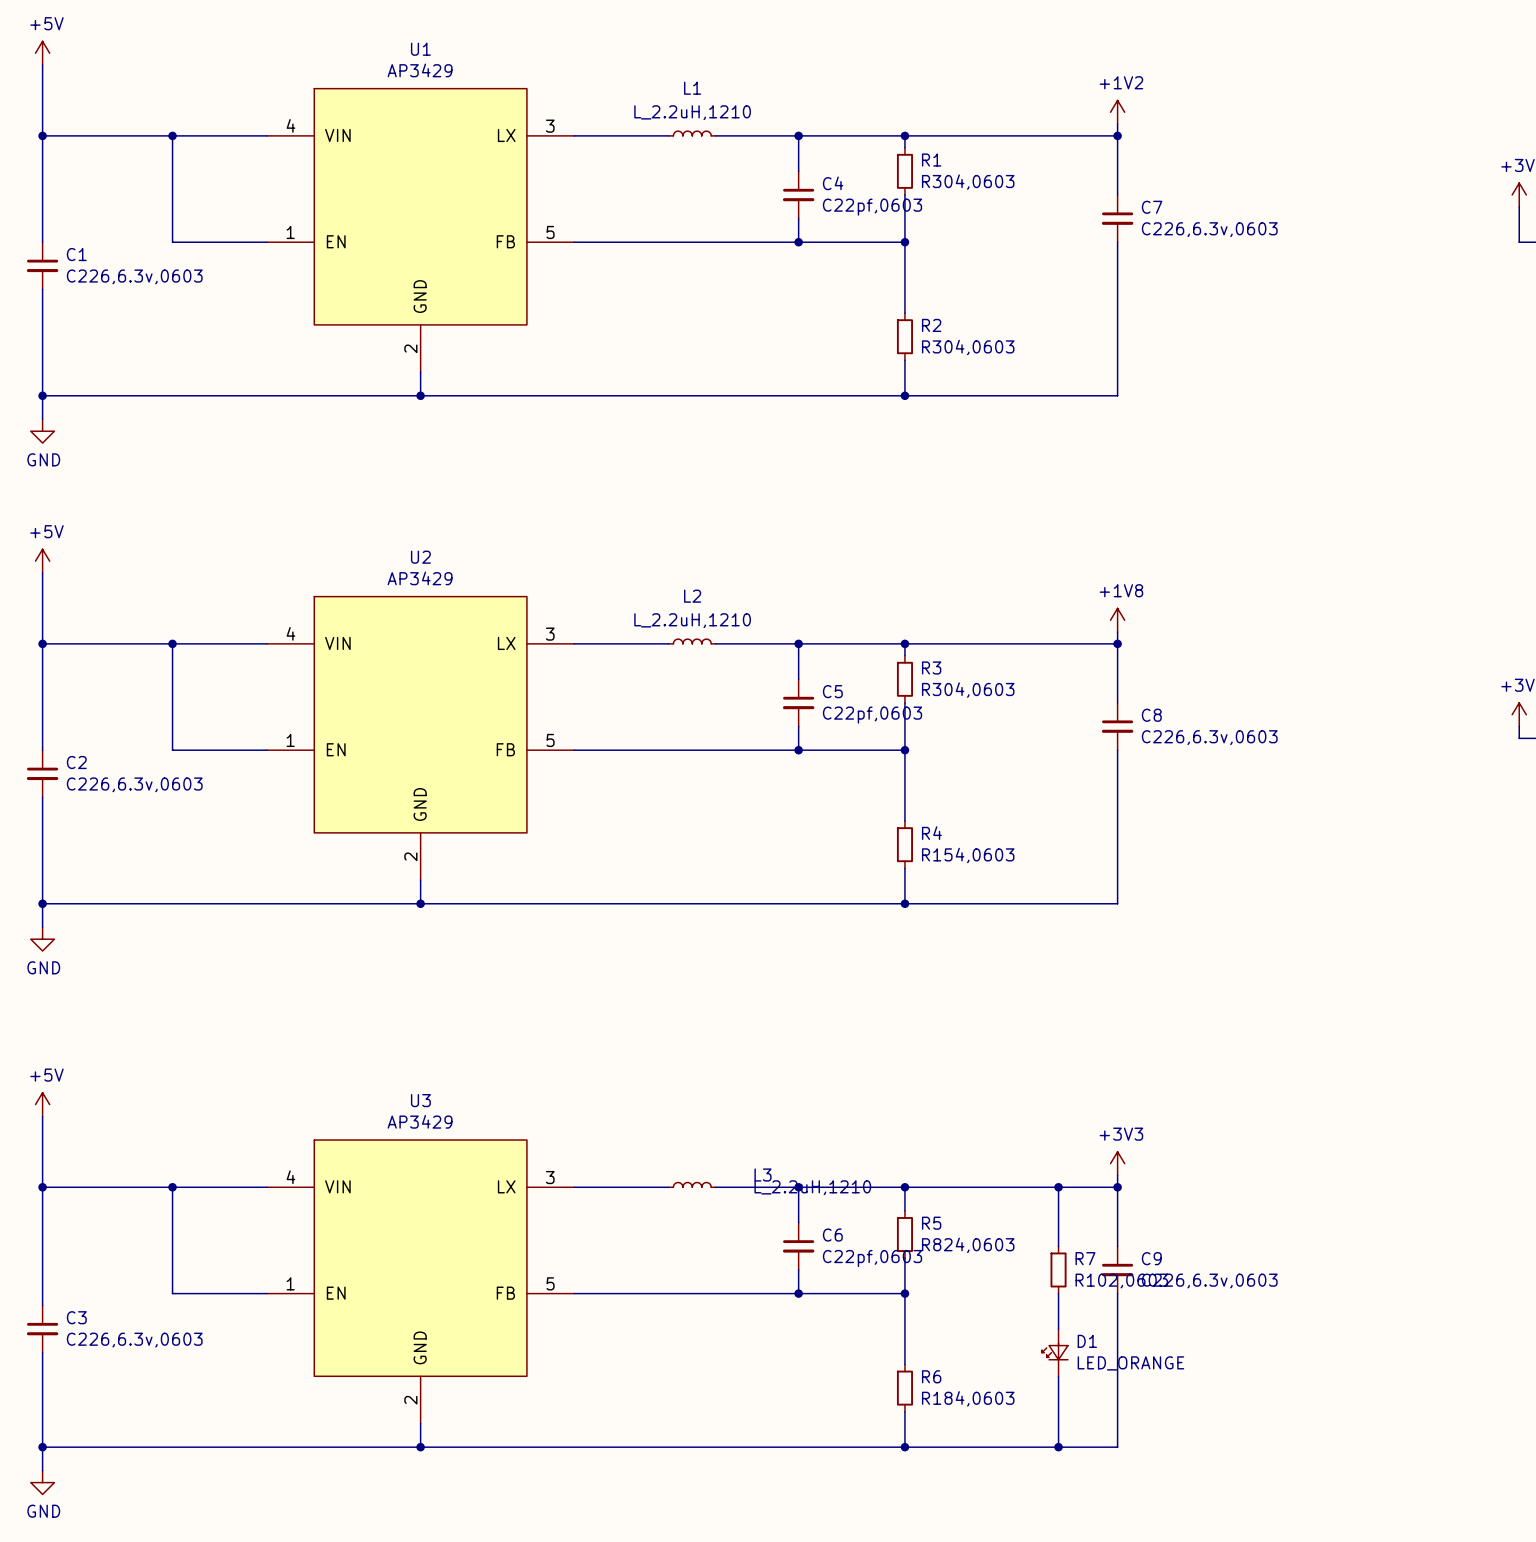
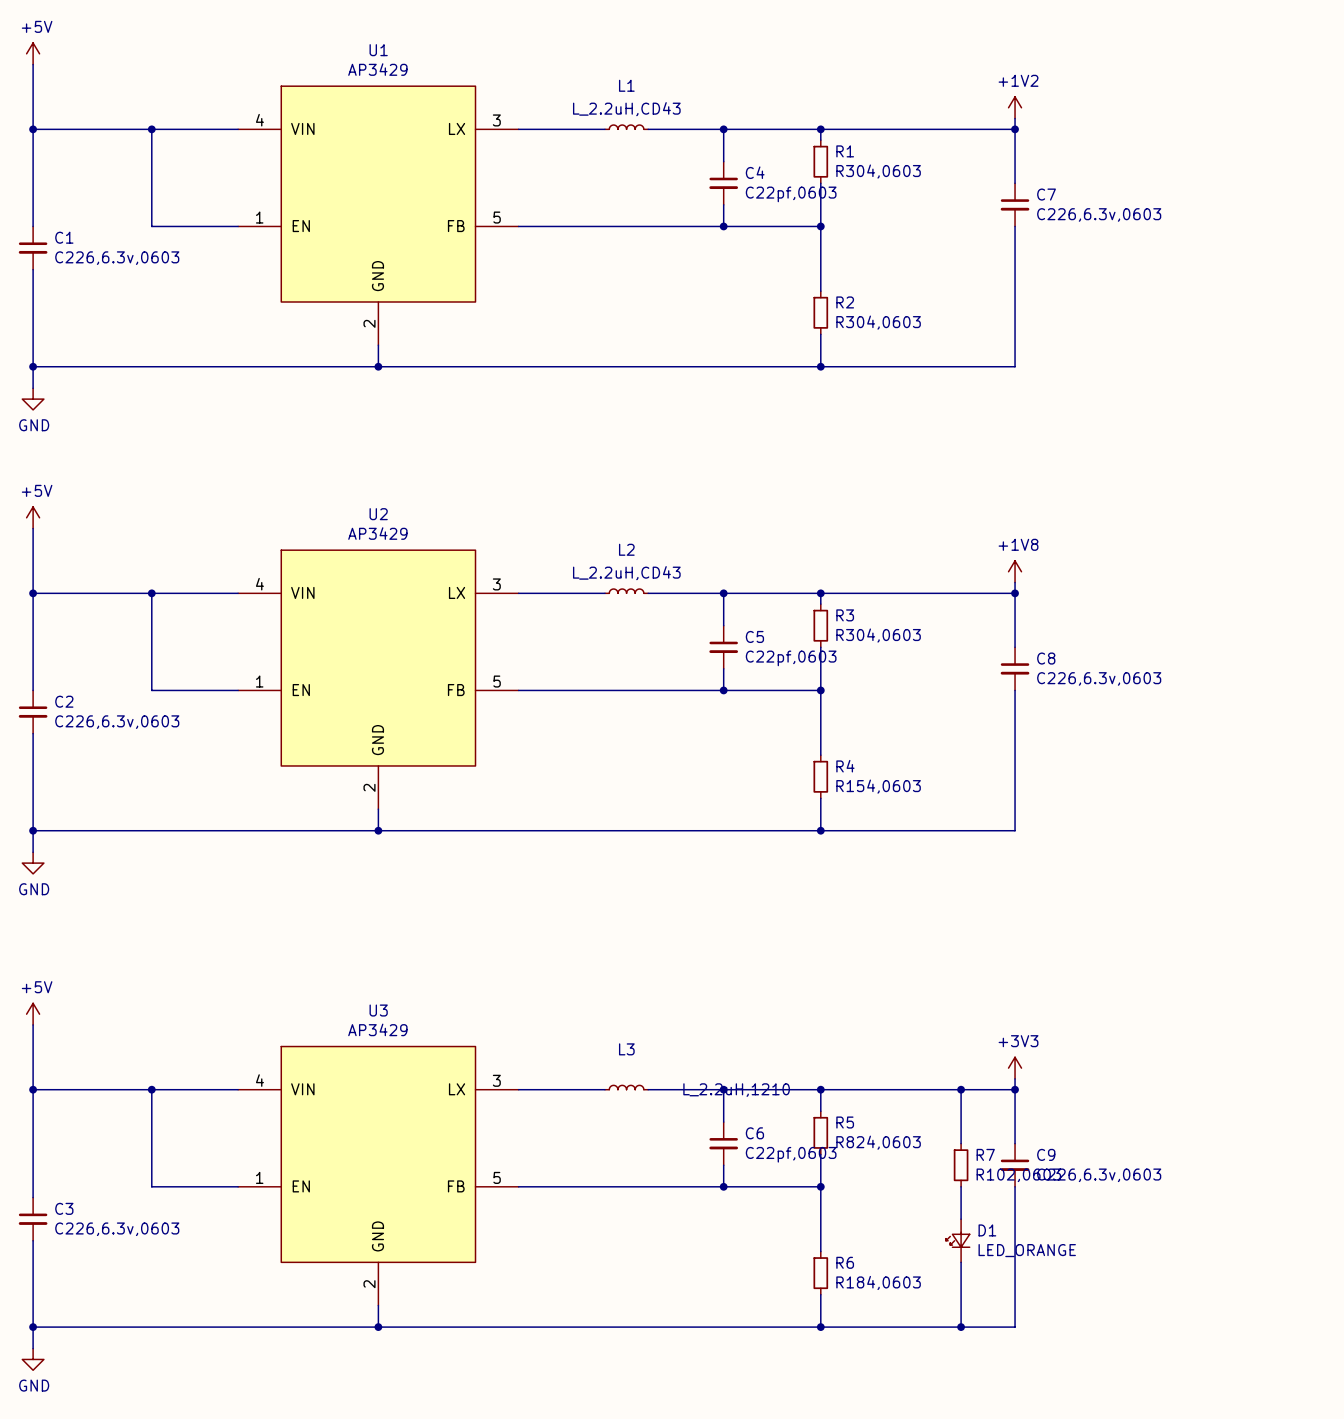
L1 value: L_2.2uH,1210 (692, 112) -> L_2.2uH,CD43 (626, 109)
L2 value: L_2.2uH,1210 (692, 620) -> L_2.2uH,CD43 (626, 573)
L3 name position: L3 (763, 1175) -> L3 (626, 1049)

